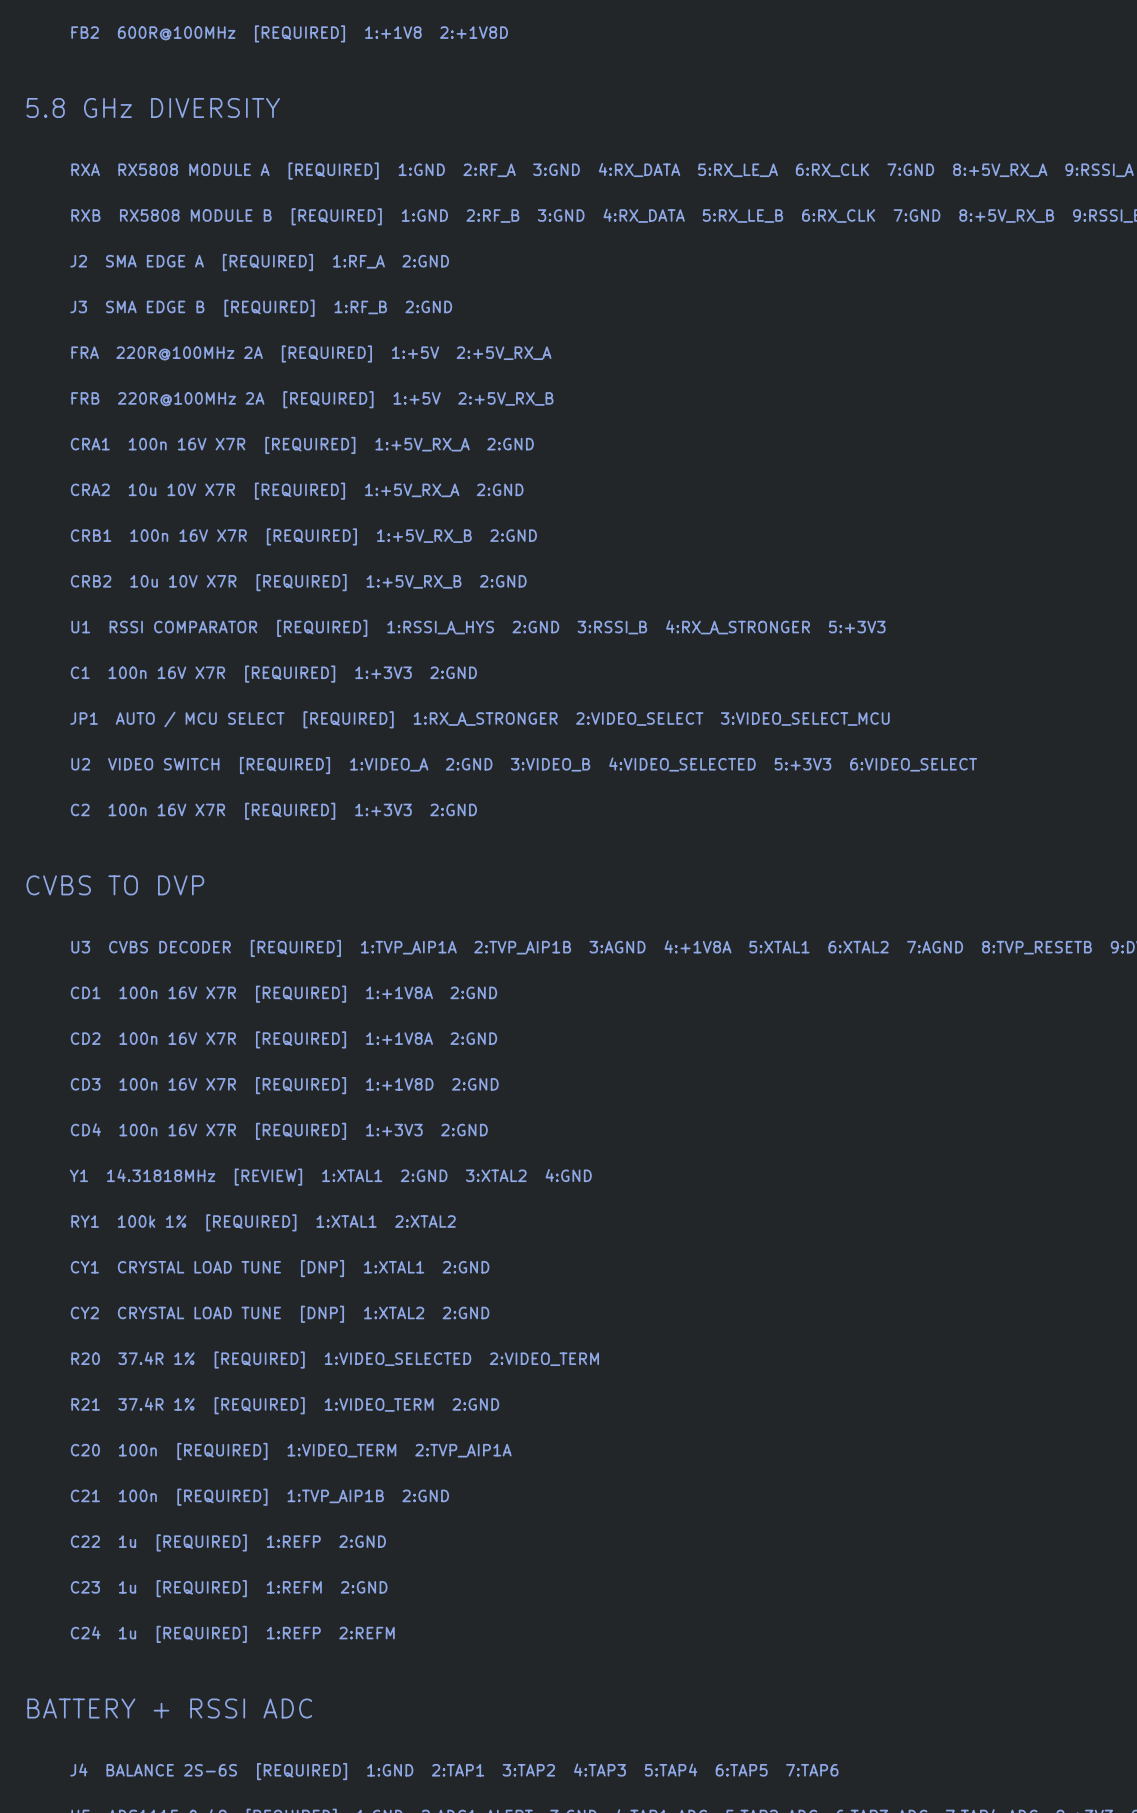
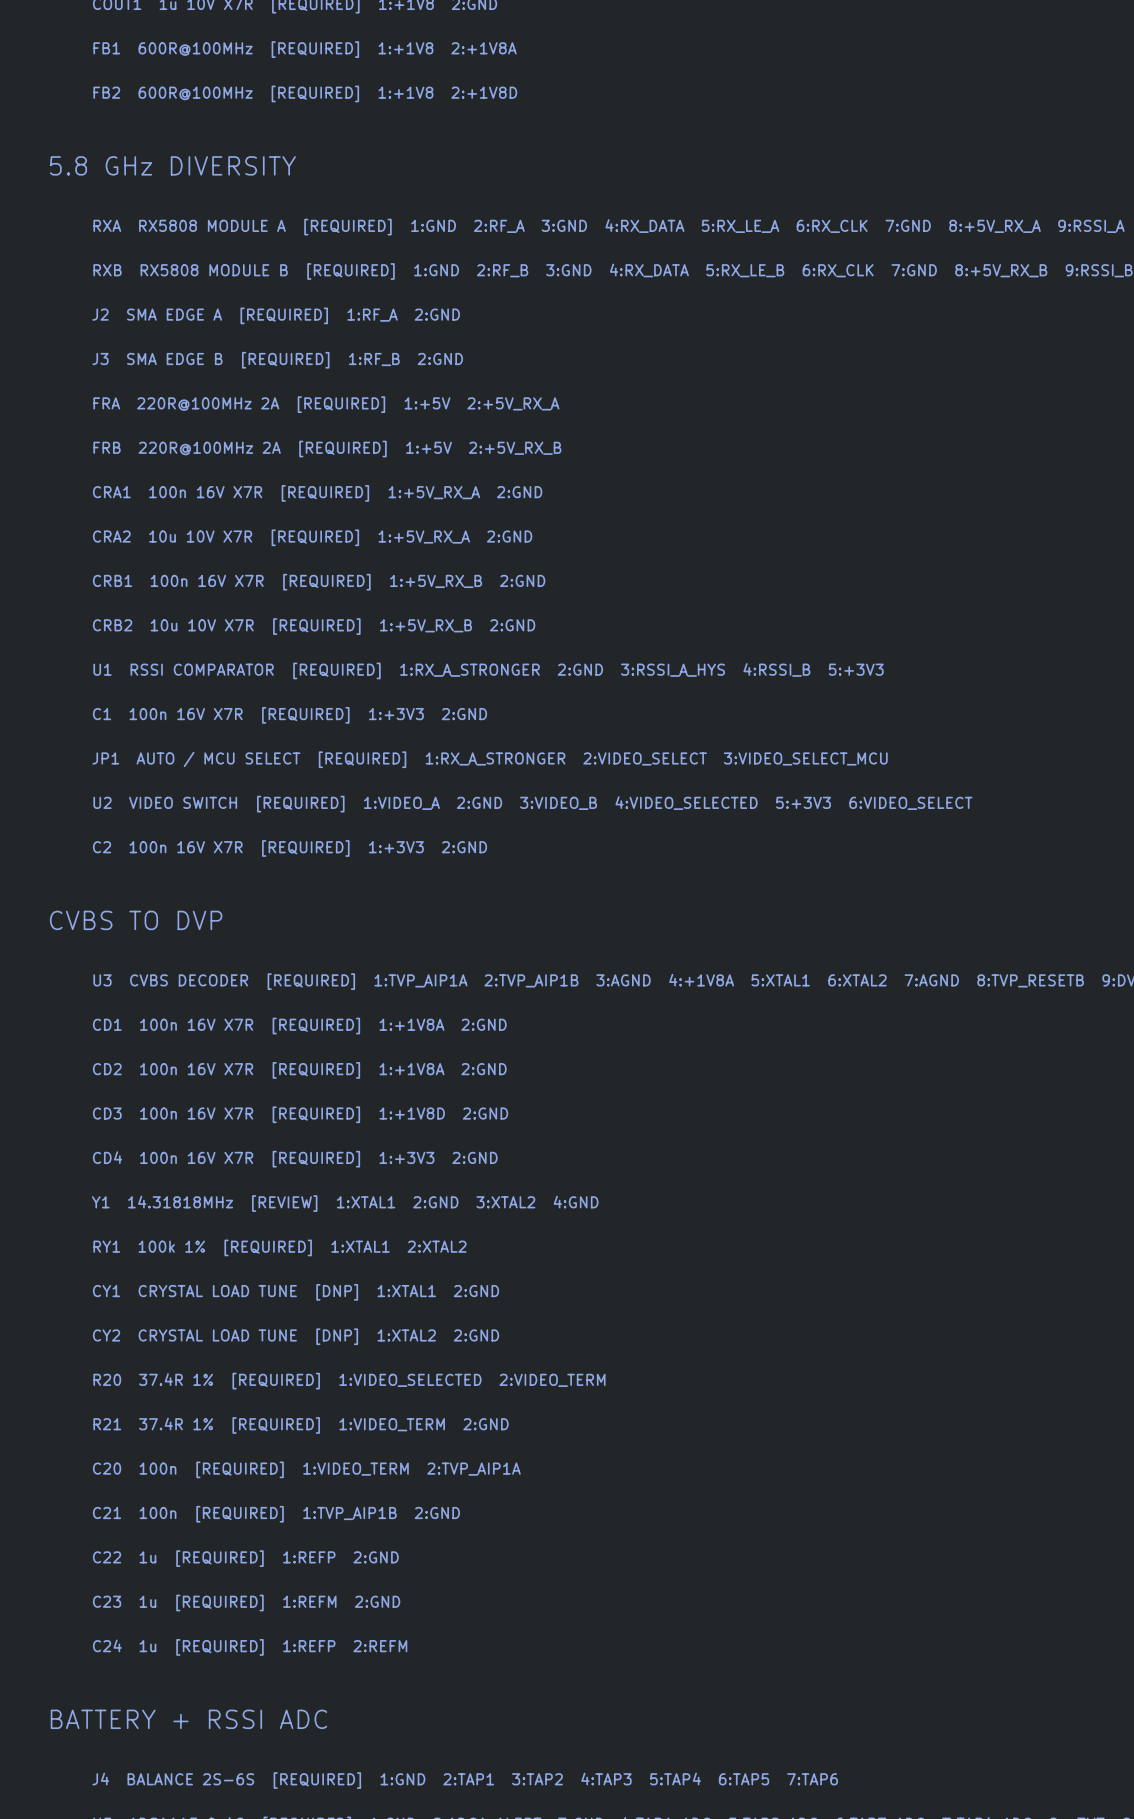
text: U1 RSSI COMPARATOR [REQUIRED] 1:RSSI_A_HYS 2:GND 3:RSSI_B 4:RX_A_STRONGER 5:+3V3 (478, 628) -> U1 RSSI COMPARATOR [REQUIRED] 1:RX_A_STRONGER 2:GND 3:RSSI_A_HYS 4:RSSI_B 5:+3V3 (488, 670)

